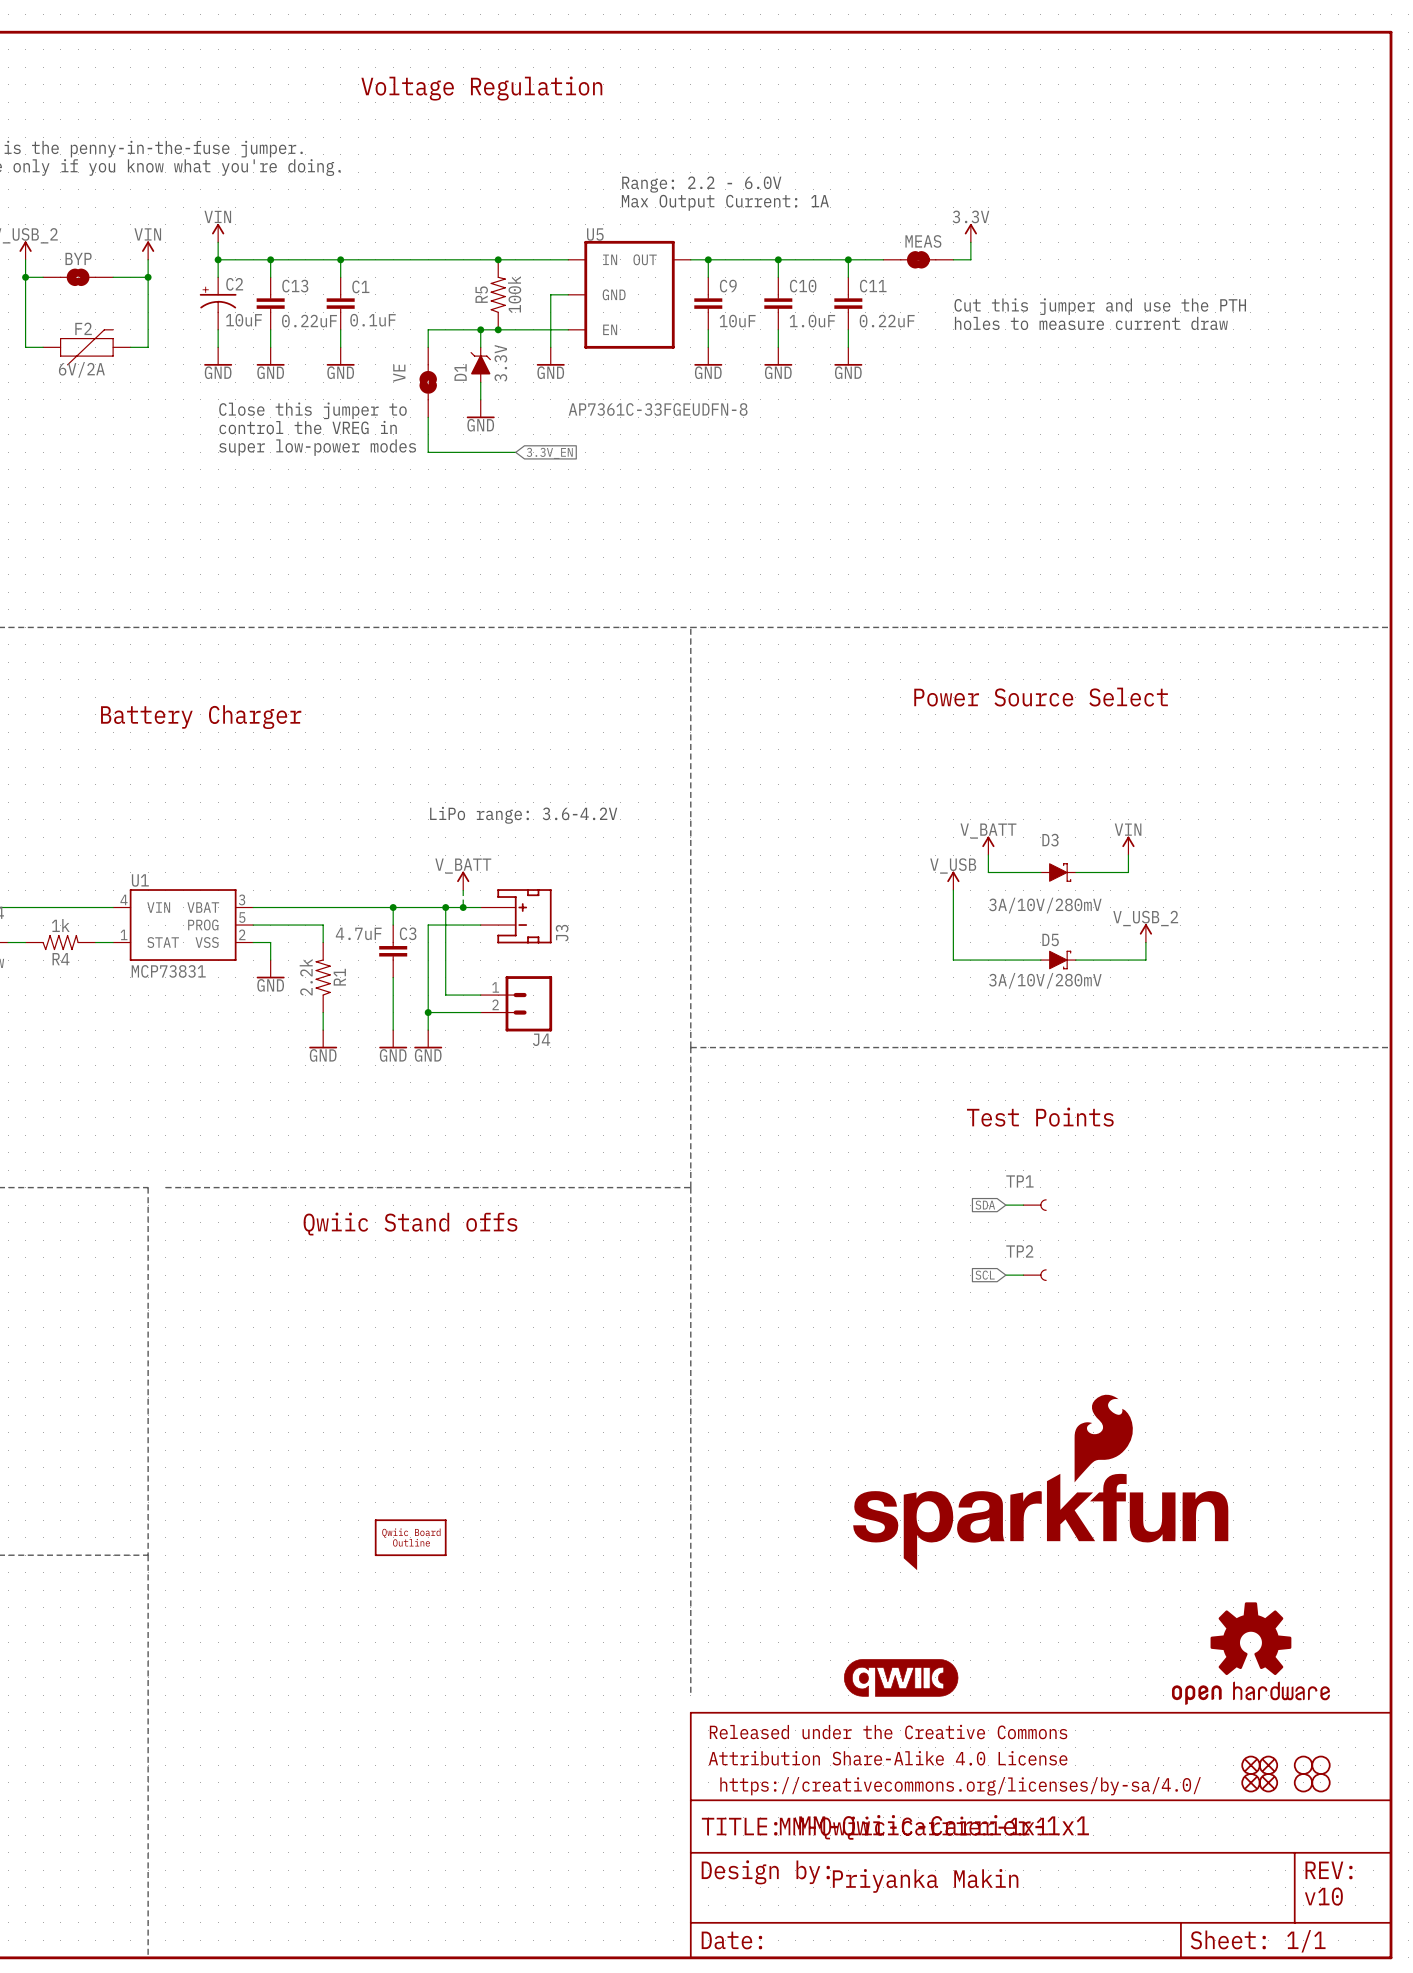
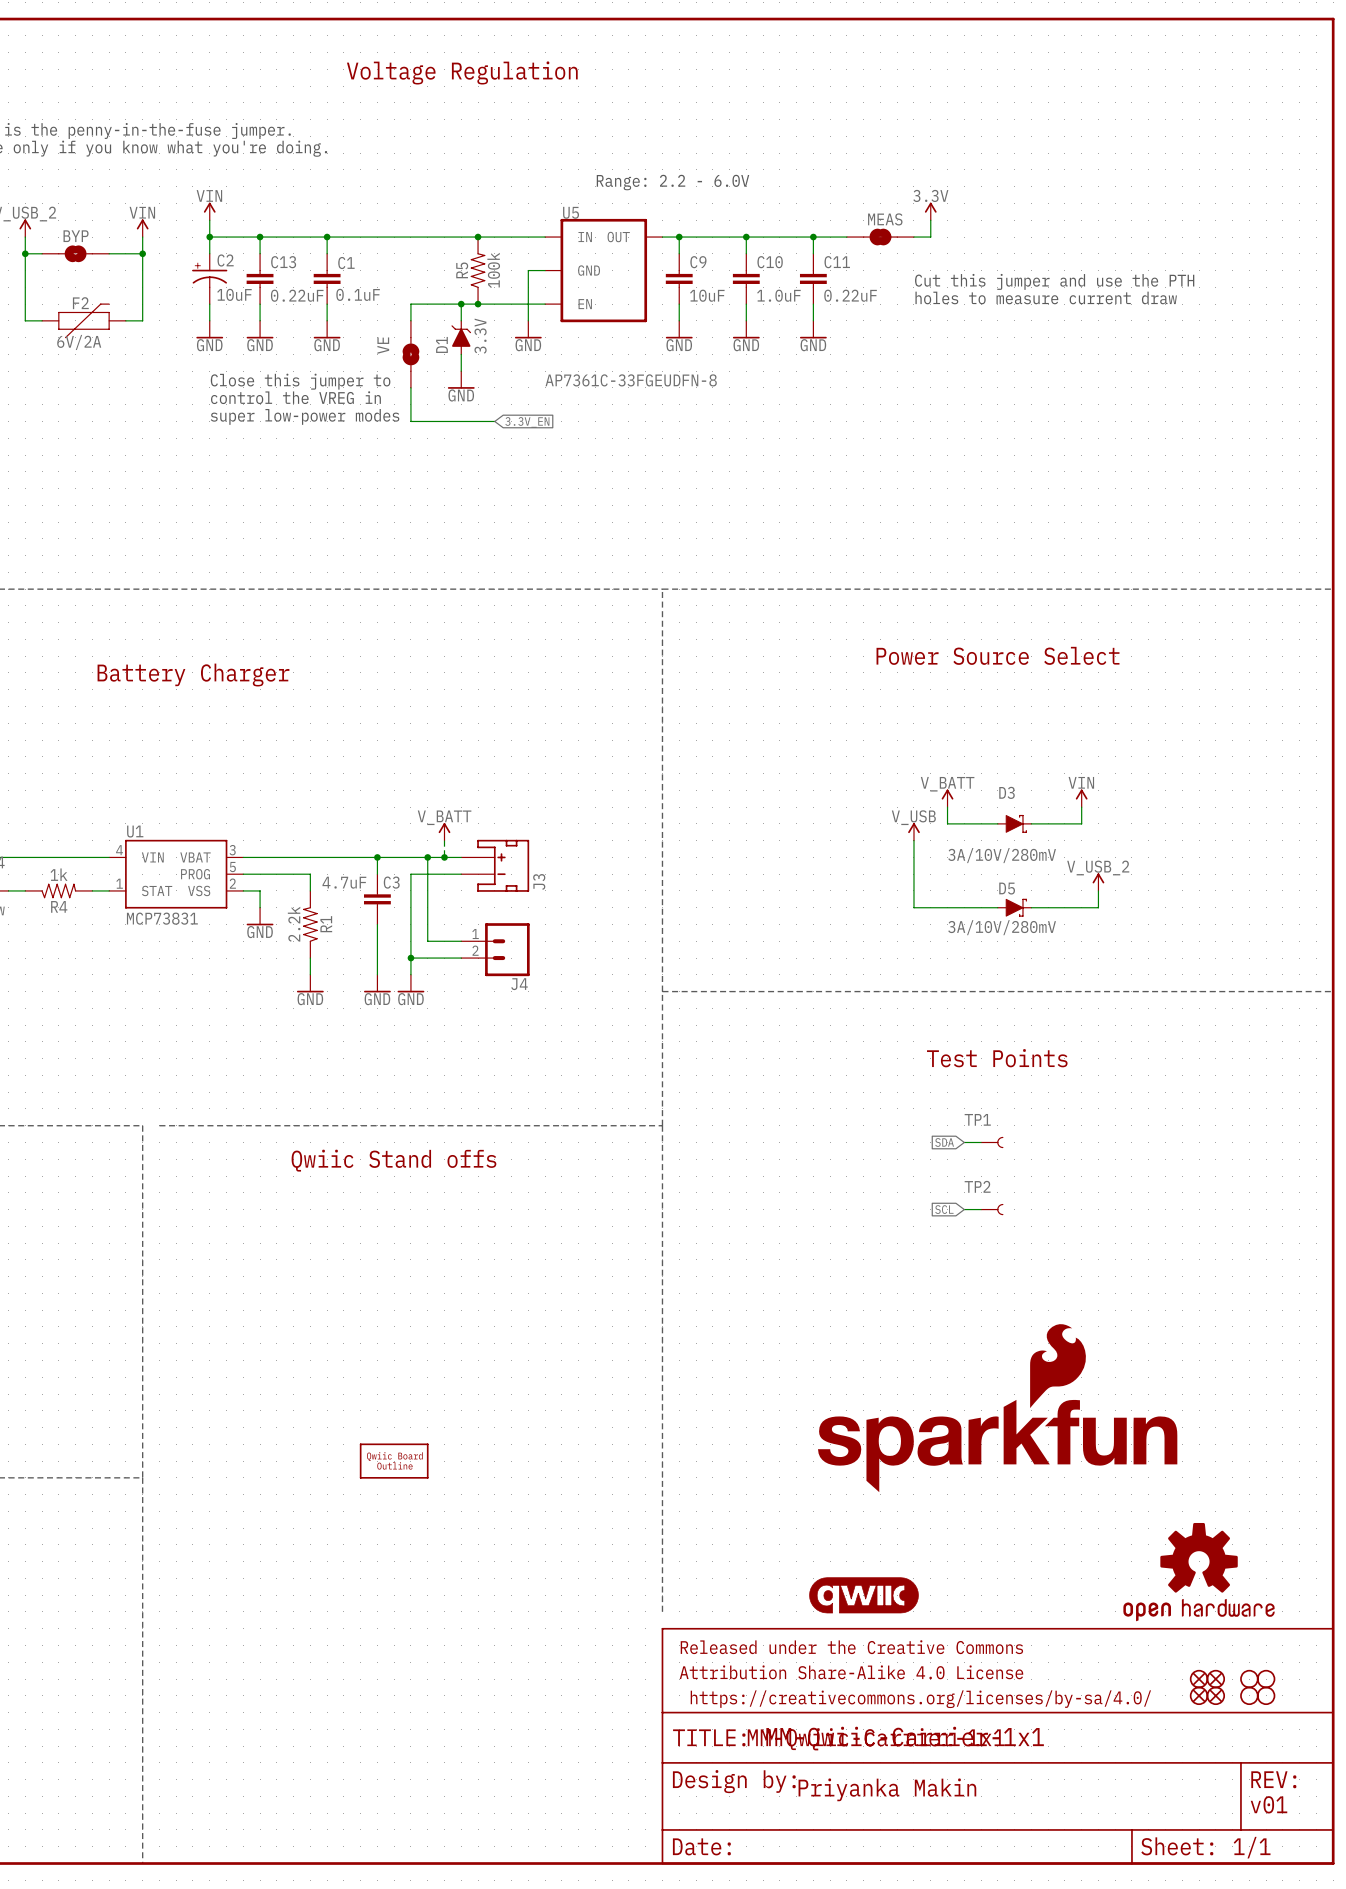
text: Range: 2.2 - 6.0V (701, 184) -> none
text: Max Output Current: 1A (725, 202) -> Range: 2.2 - 6.0V (673, 182)
text: LiPo range: 3.6-4.2V (523, 815) -> none
text: v10 (1323, 1896) -> v01 (1268, 1804)

